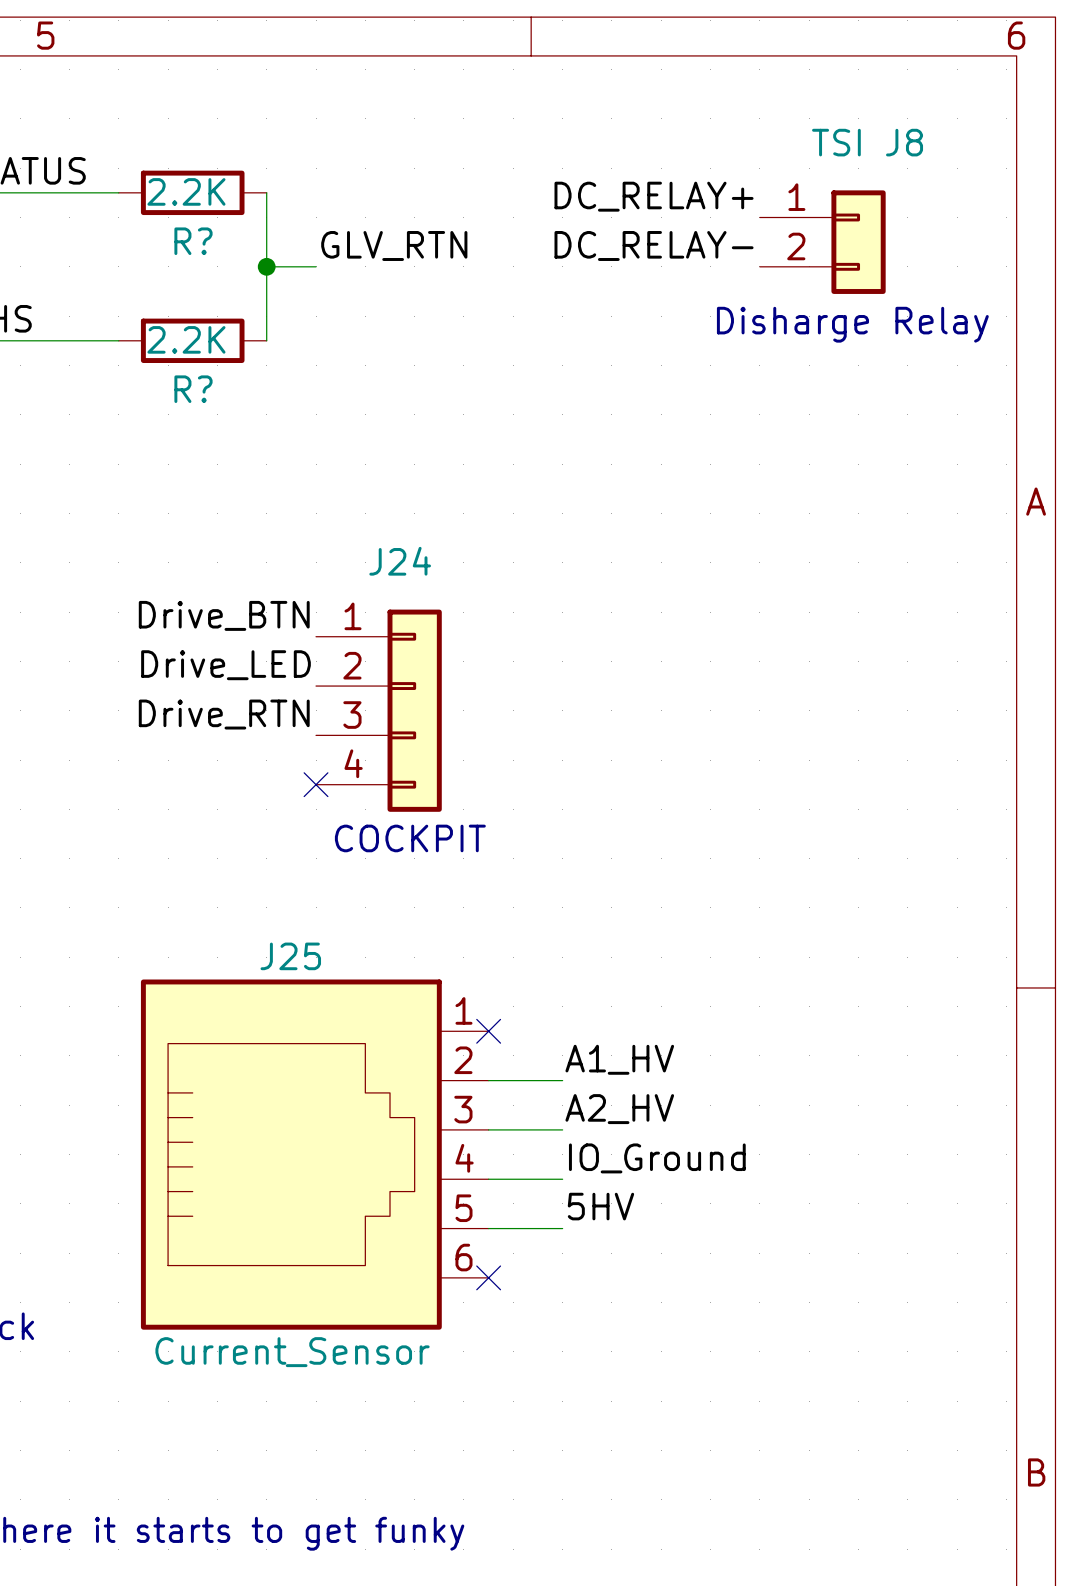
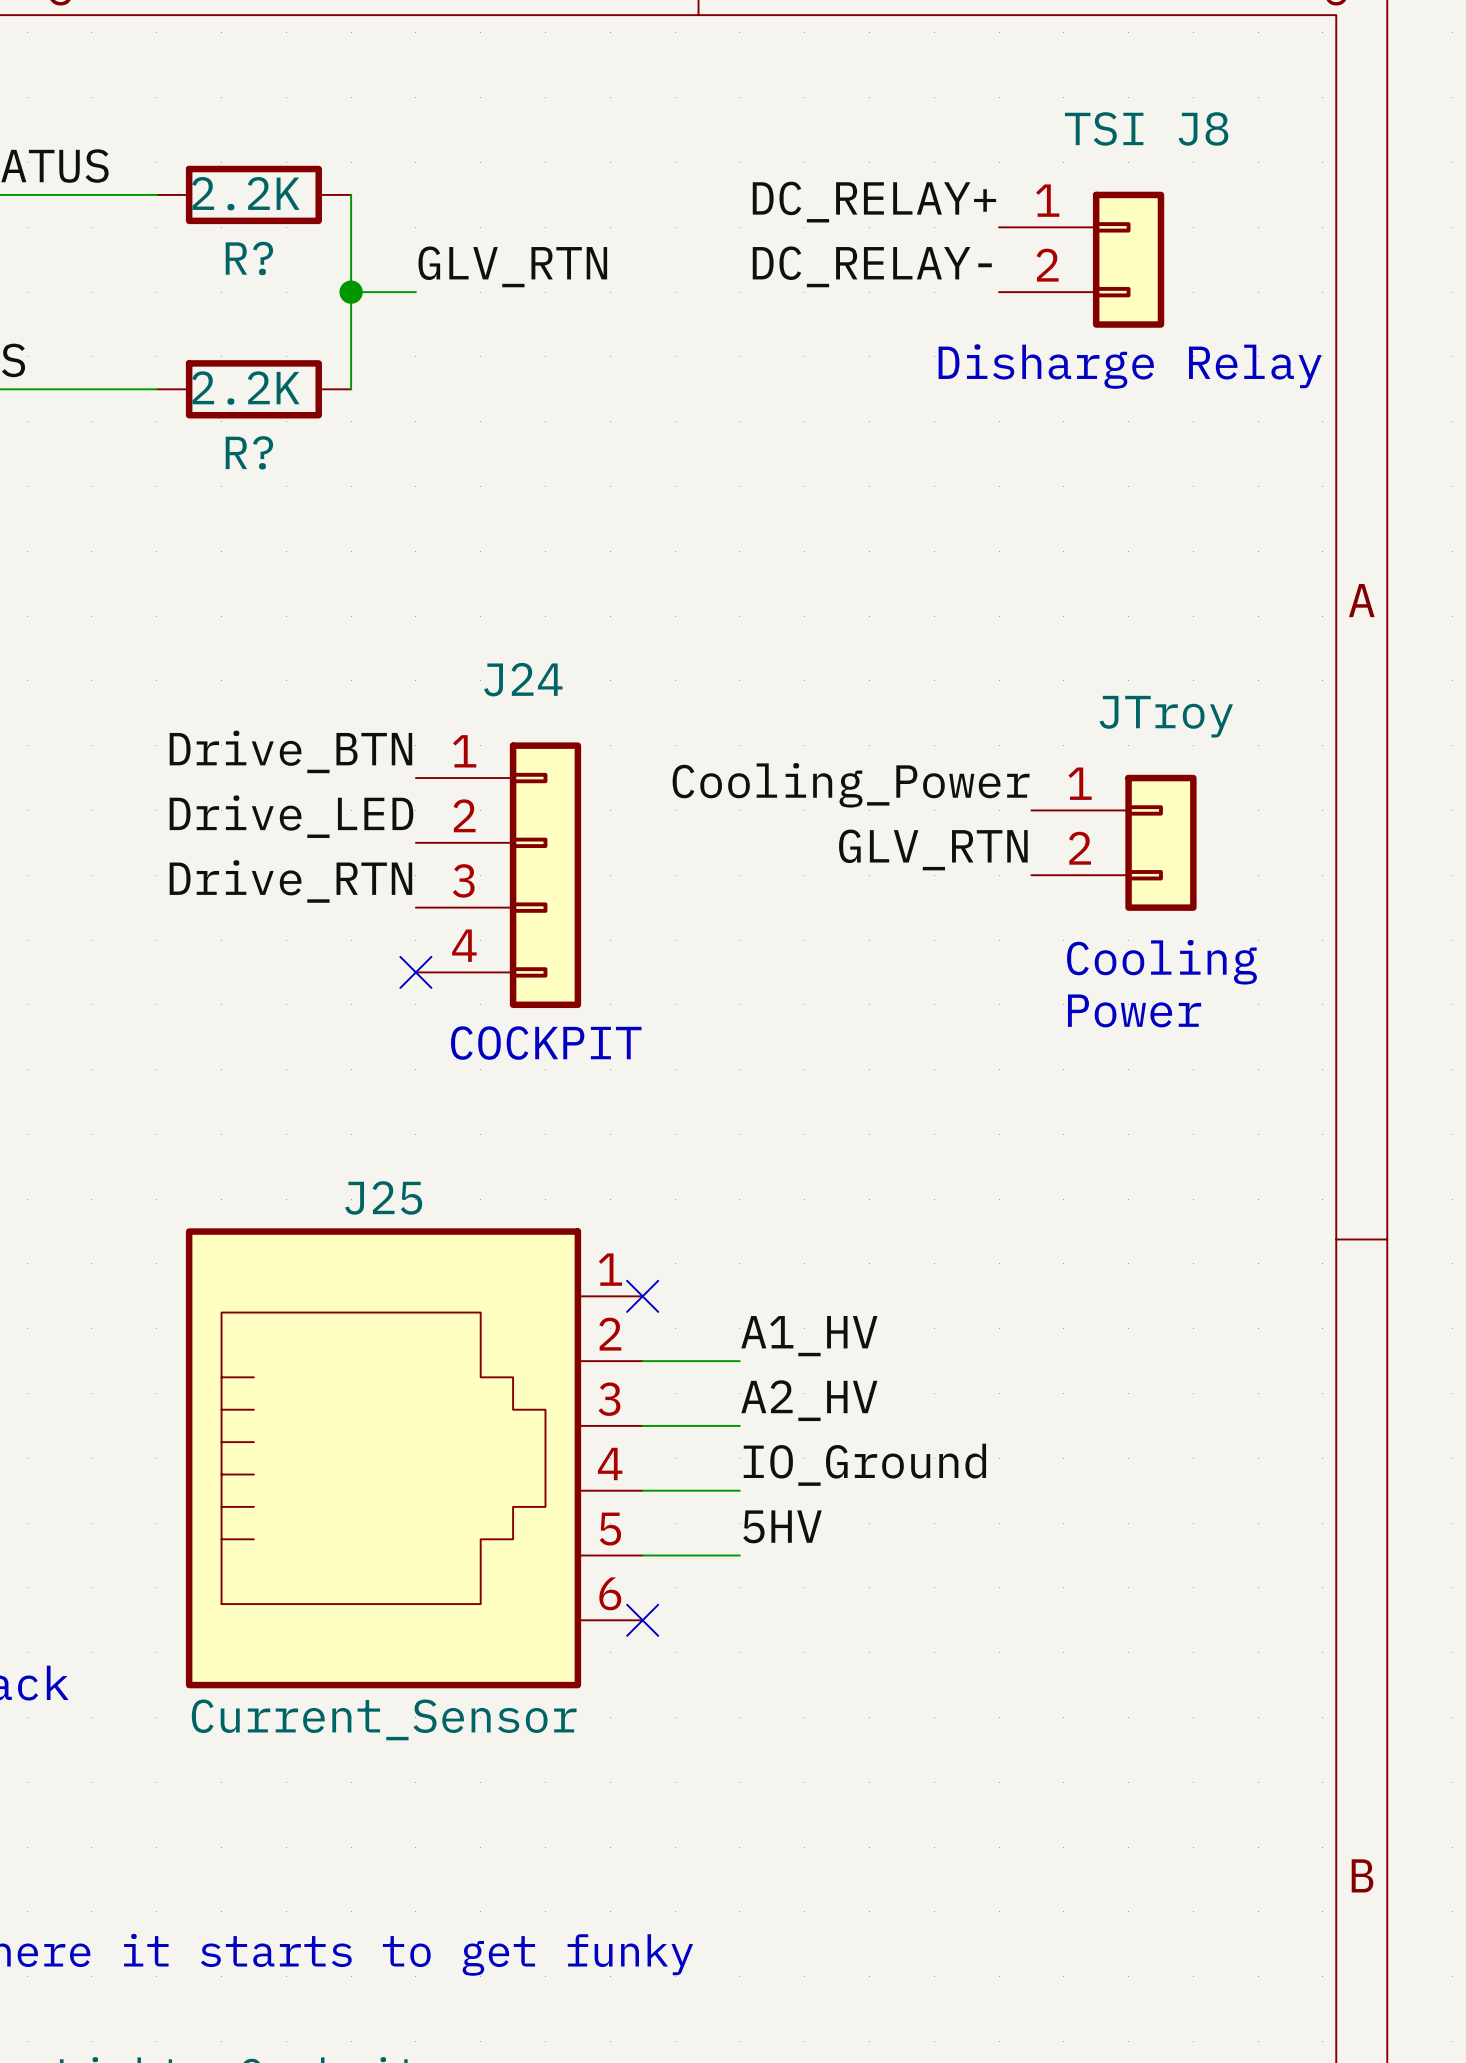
label: none -> Cooling_Power (851, 785)
part: none -> JTroy (1113, 842)
label: none -> GLV_RTN (933, 849)
text: none -> Cooling (1161, 962)
text: none -> Power (1134, 1010)

